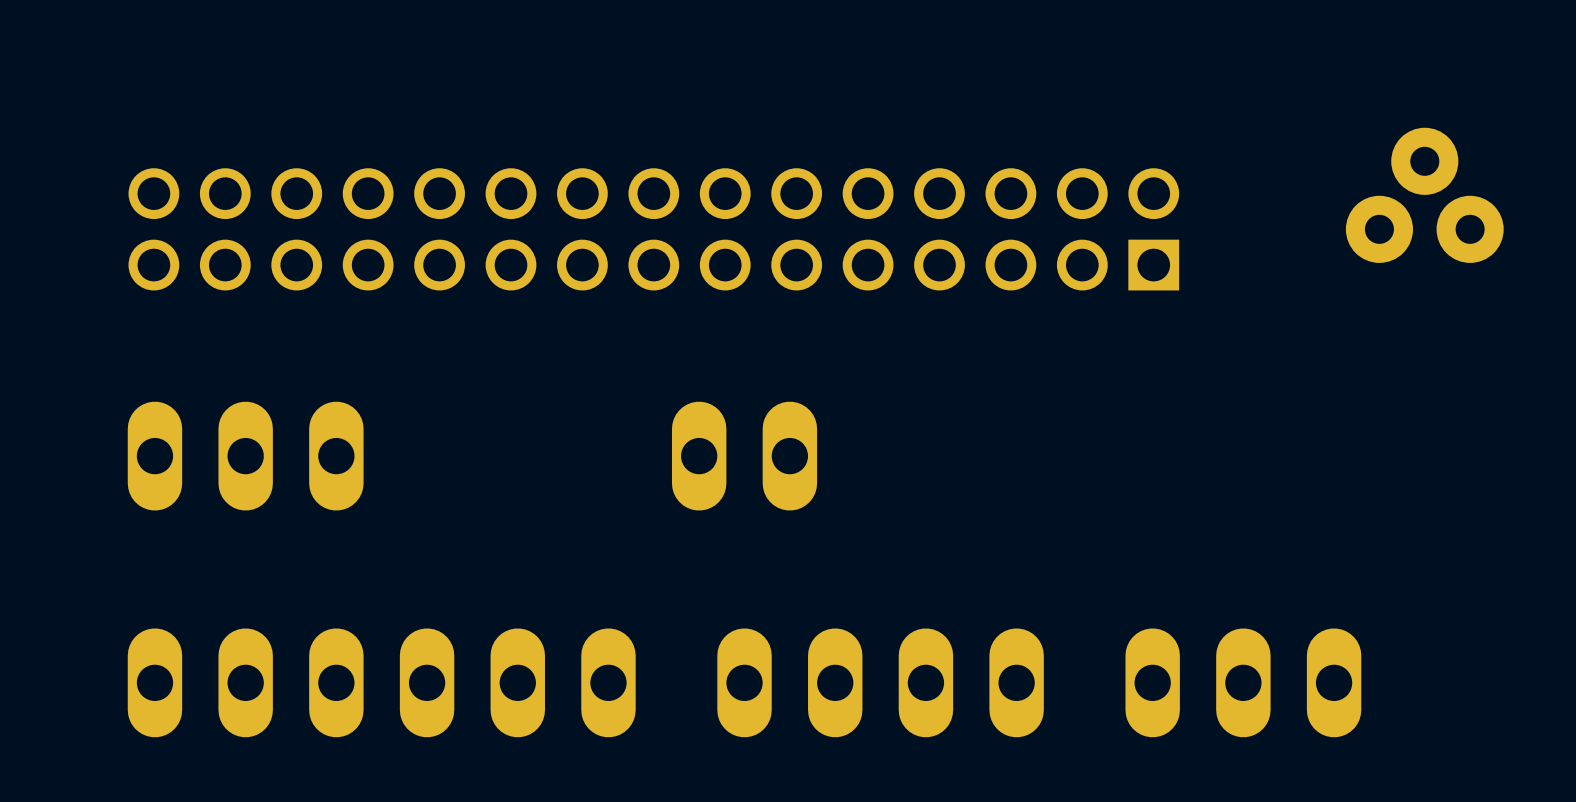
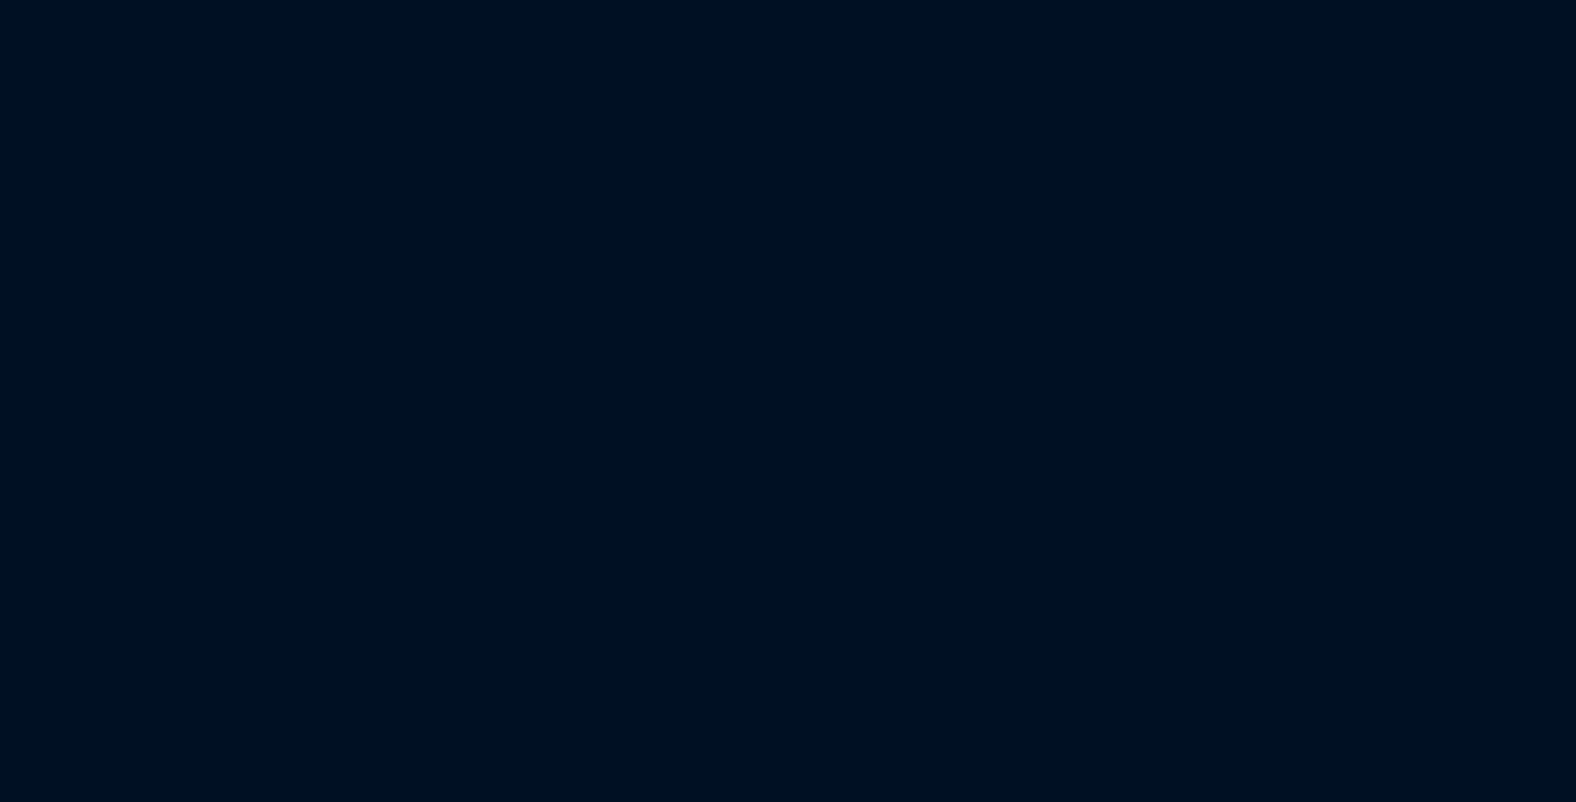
part: (1424, 195) -> none
part: (653, 229) -> none
part: (245, 456) -> none
part: (744, 456) -> none
part: (381, 682) -> none
part: (880, 682) -> none
part: (1243, 682) -> none

